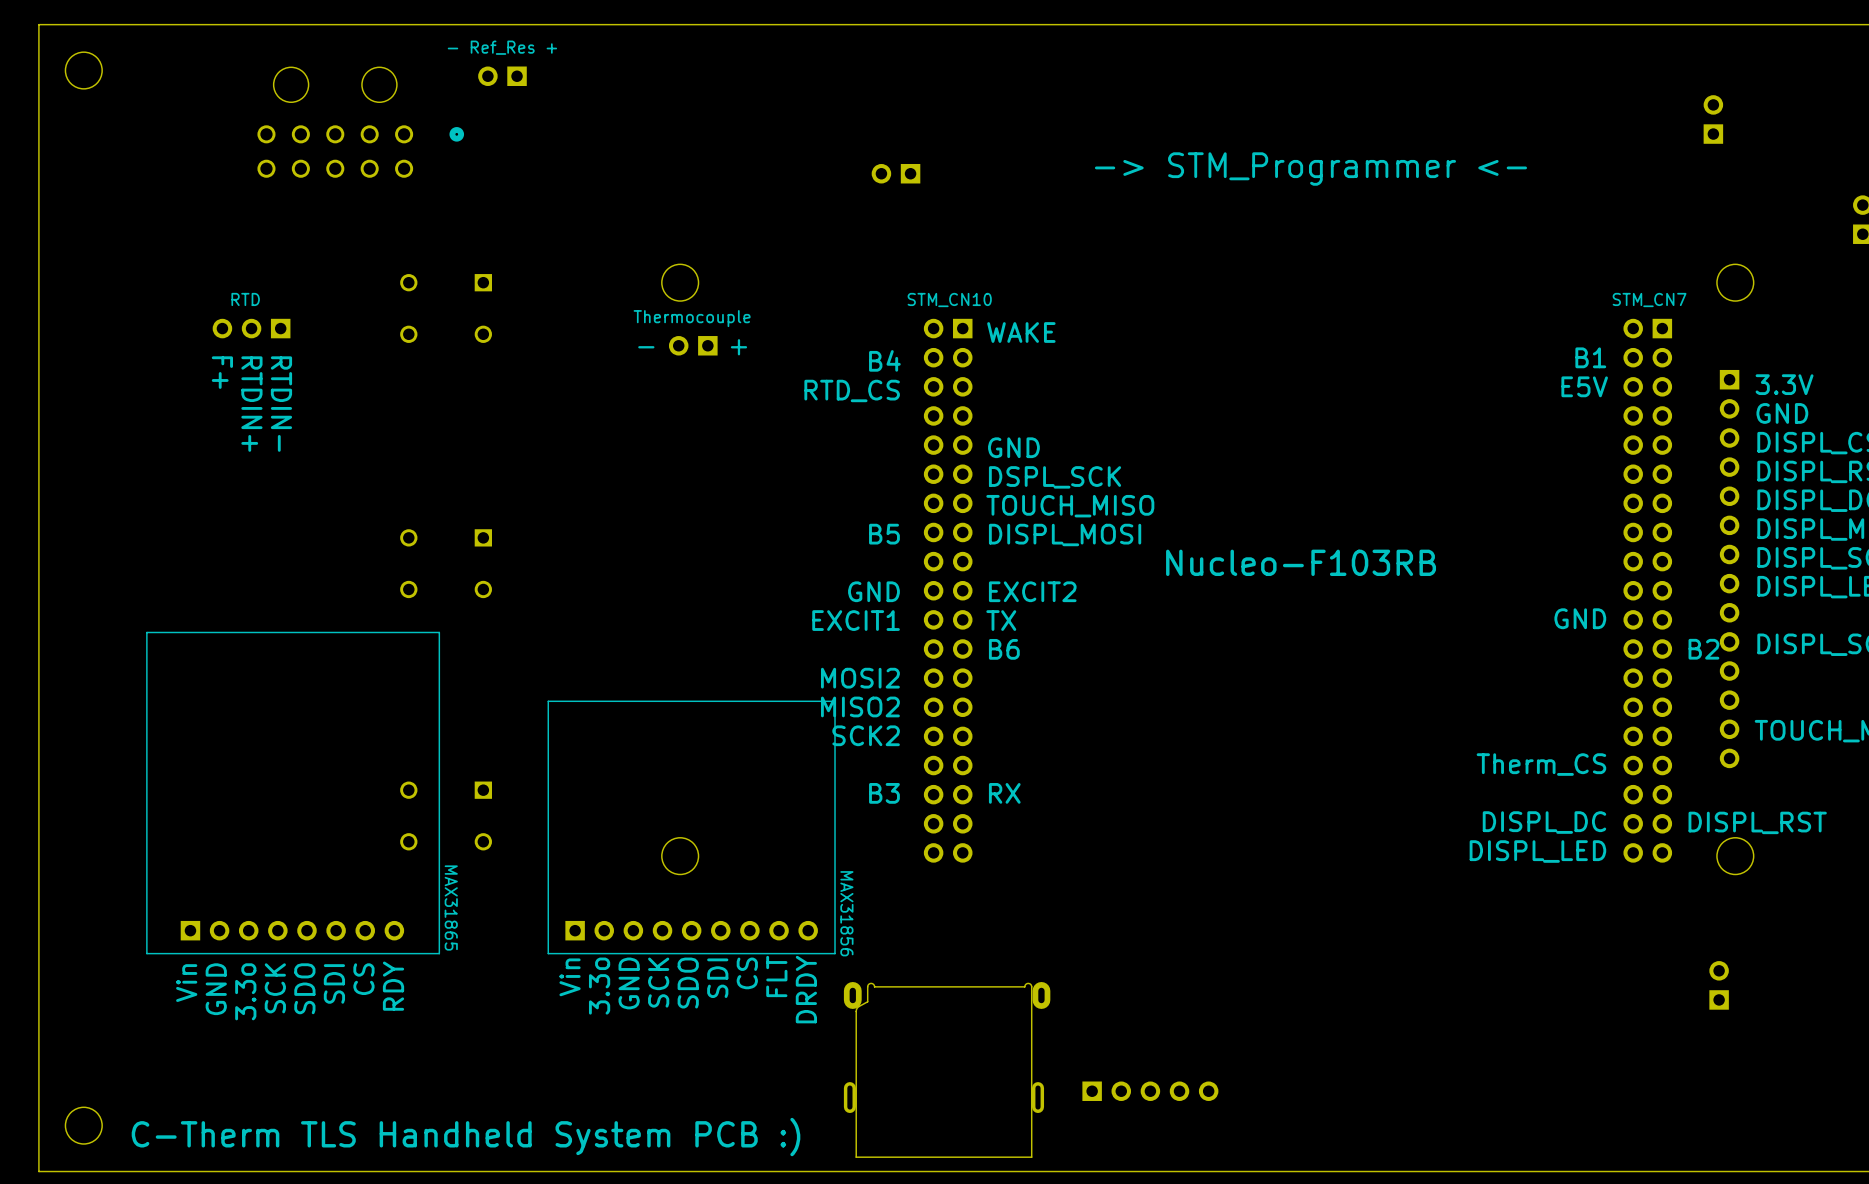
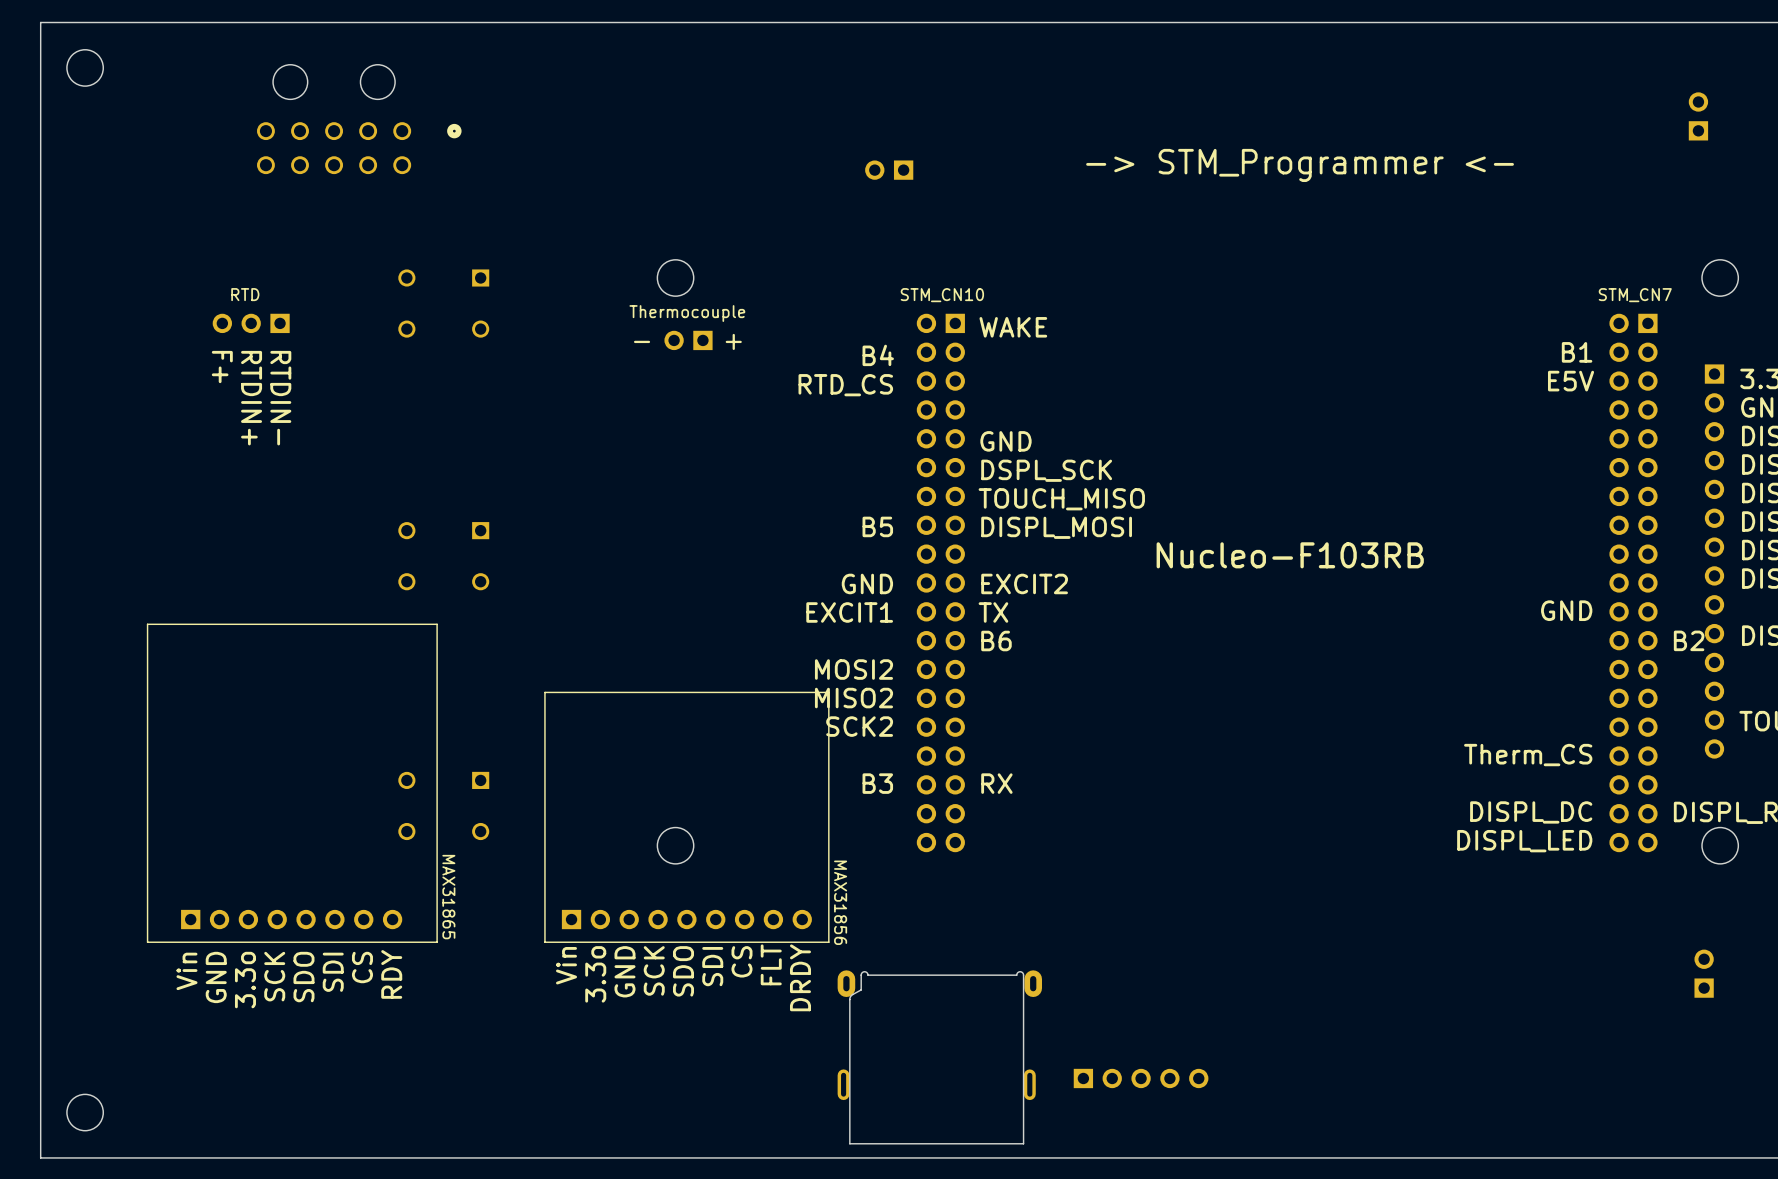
text: - Ref_Res + (502, 47) -> none
part: (502, 76) -> none
text: C-Therm TLS Handheld System PCB :) (466, 1137) -> none

